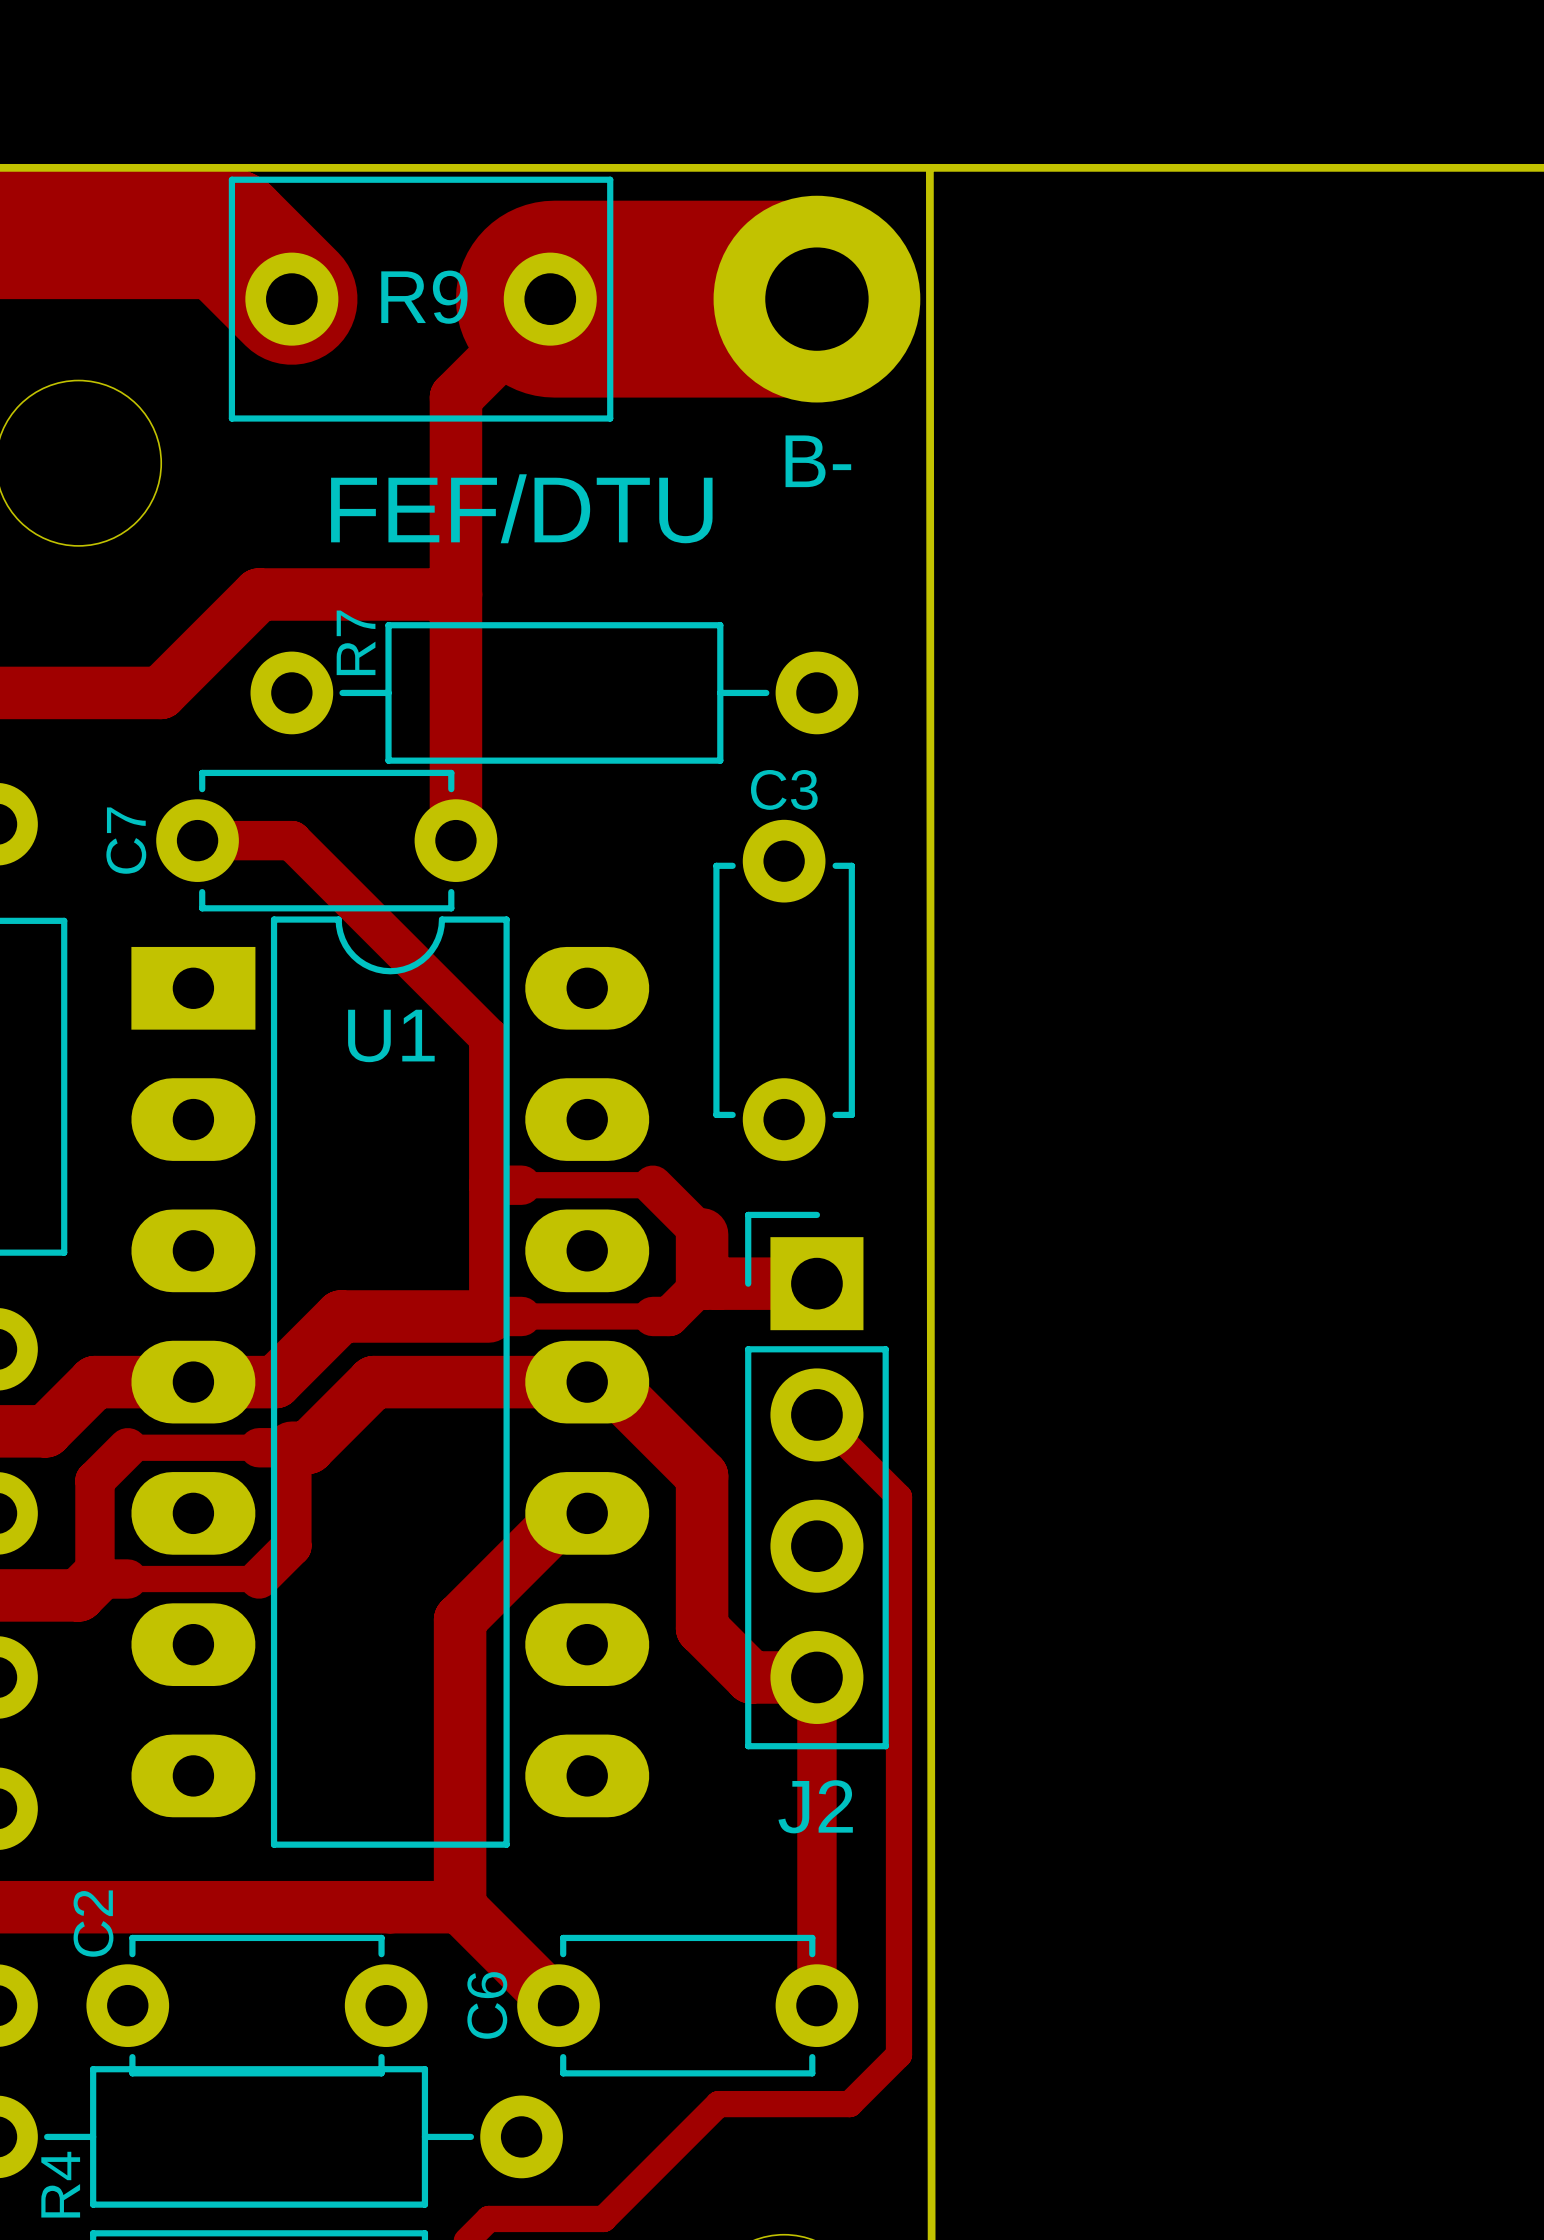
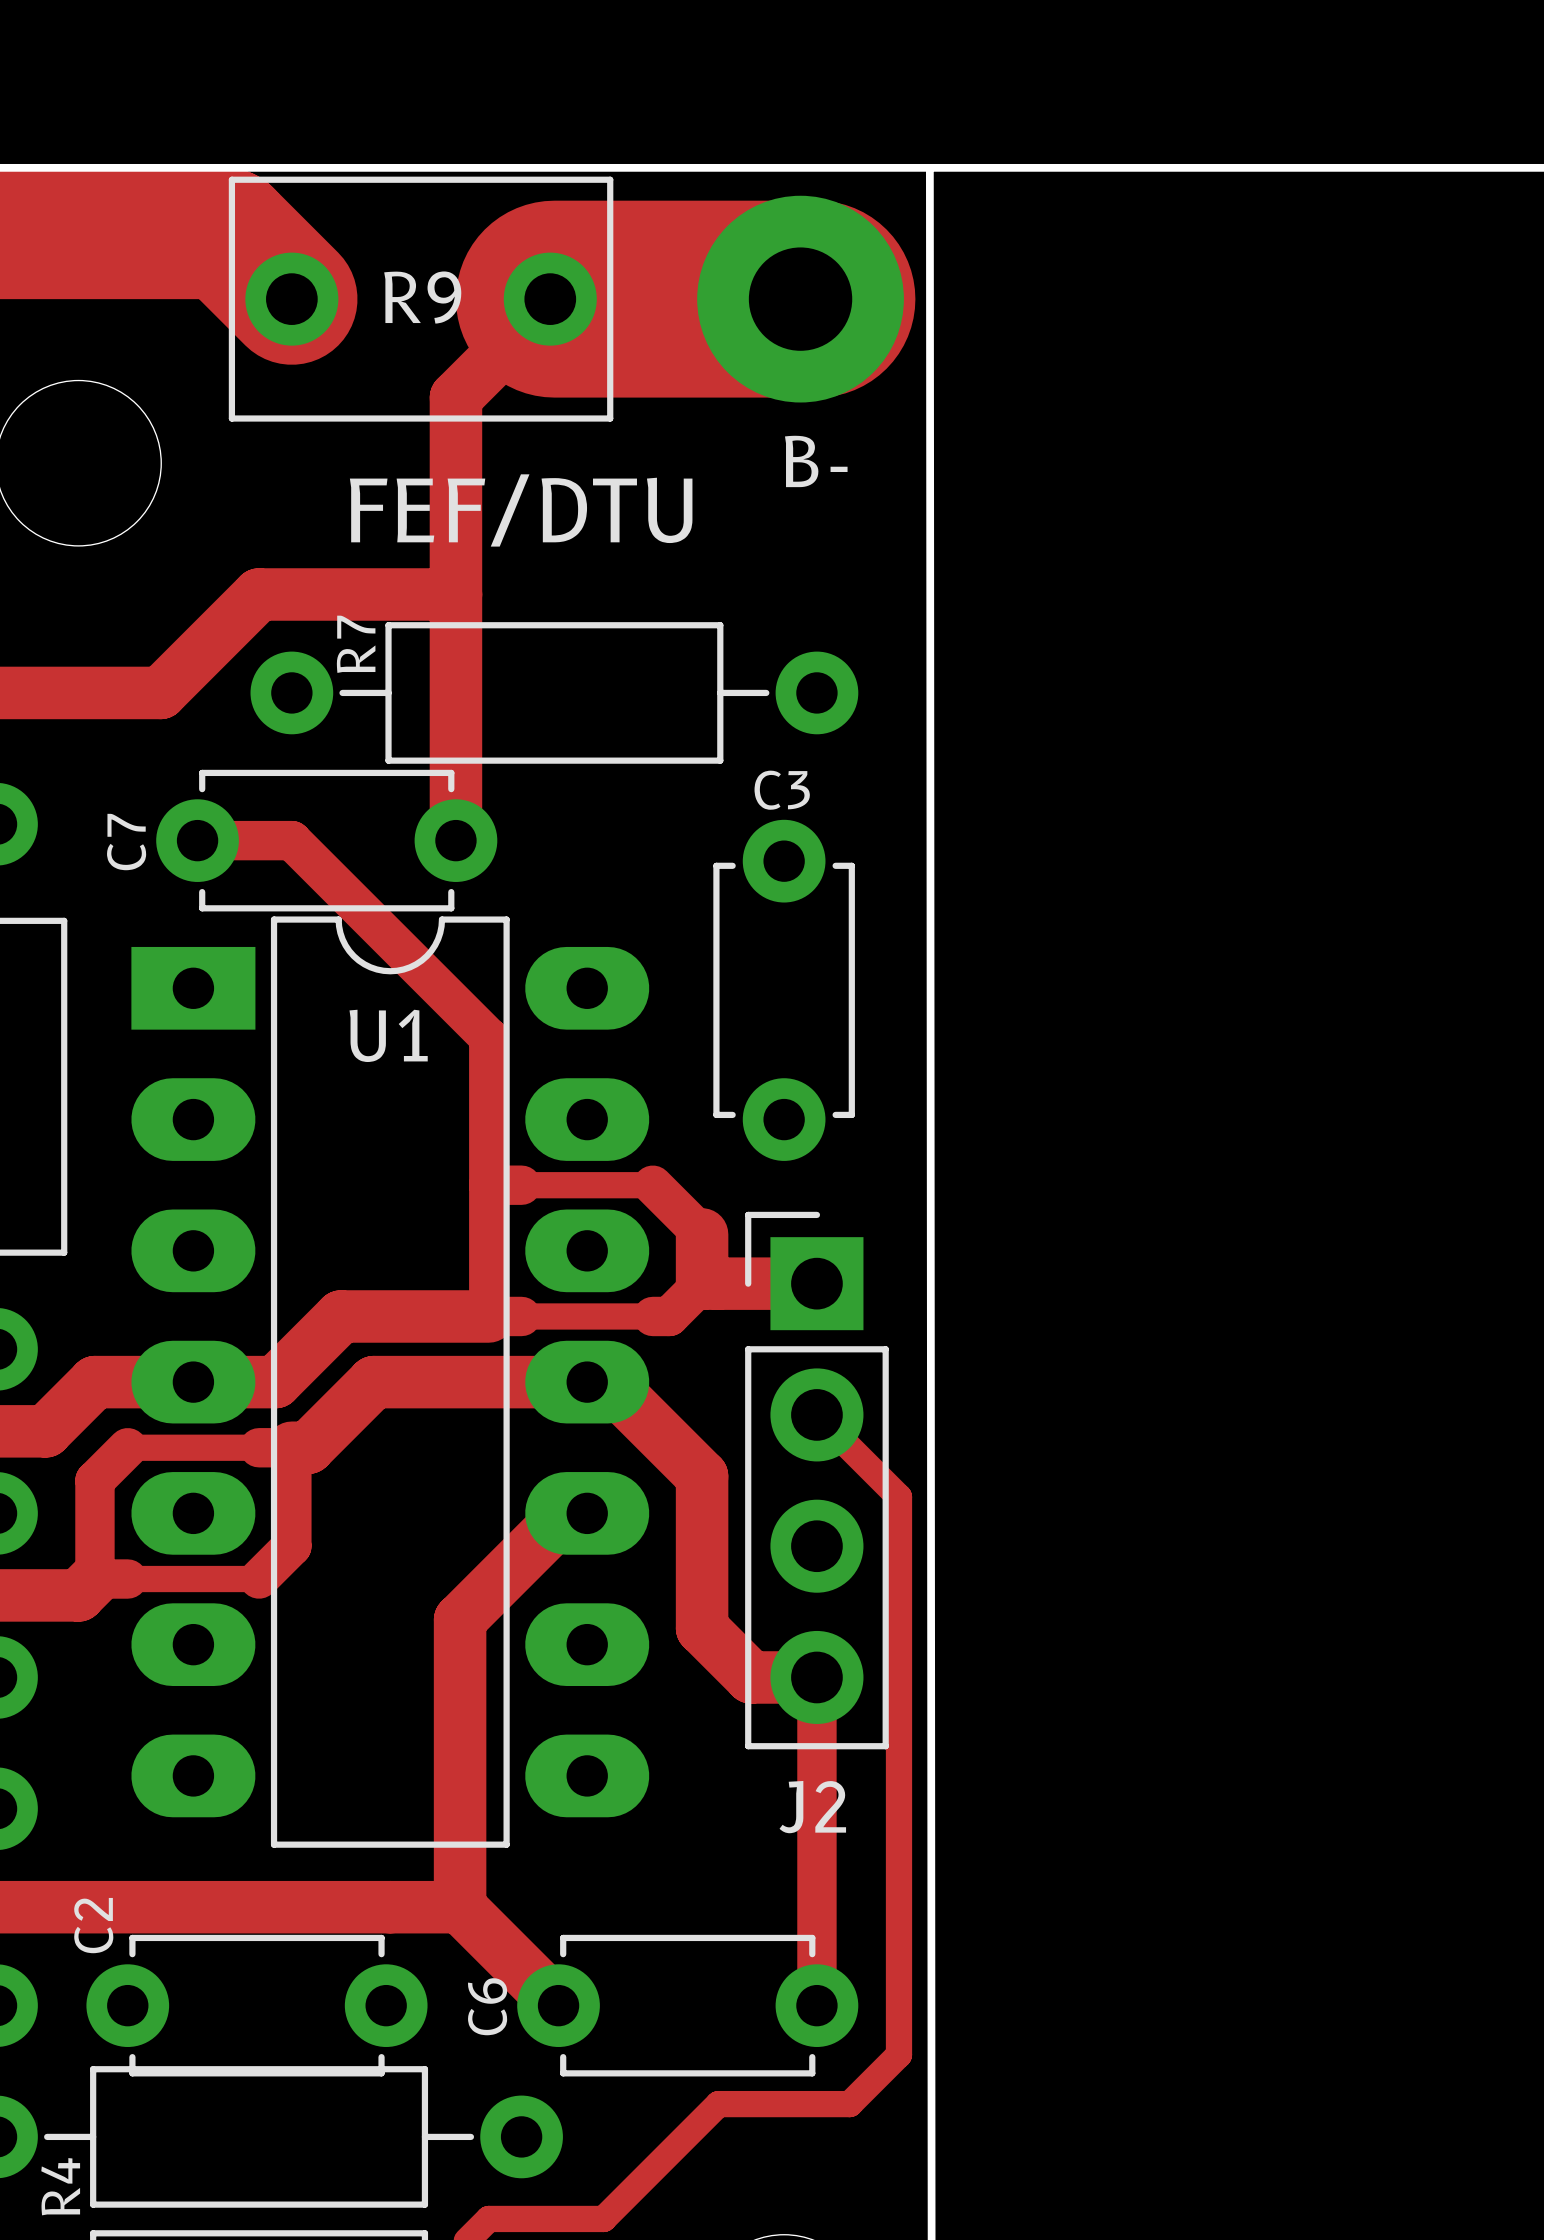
part position: (816, 299) -> (800, 299)

